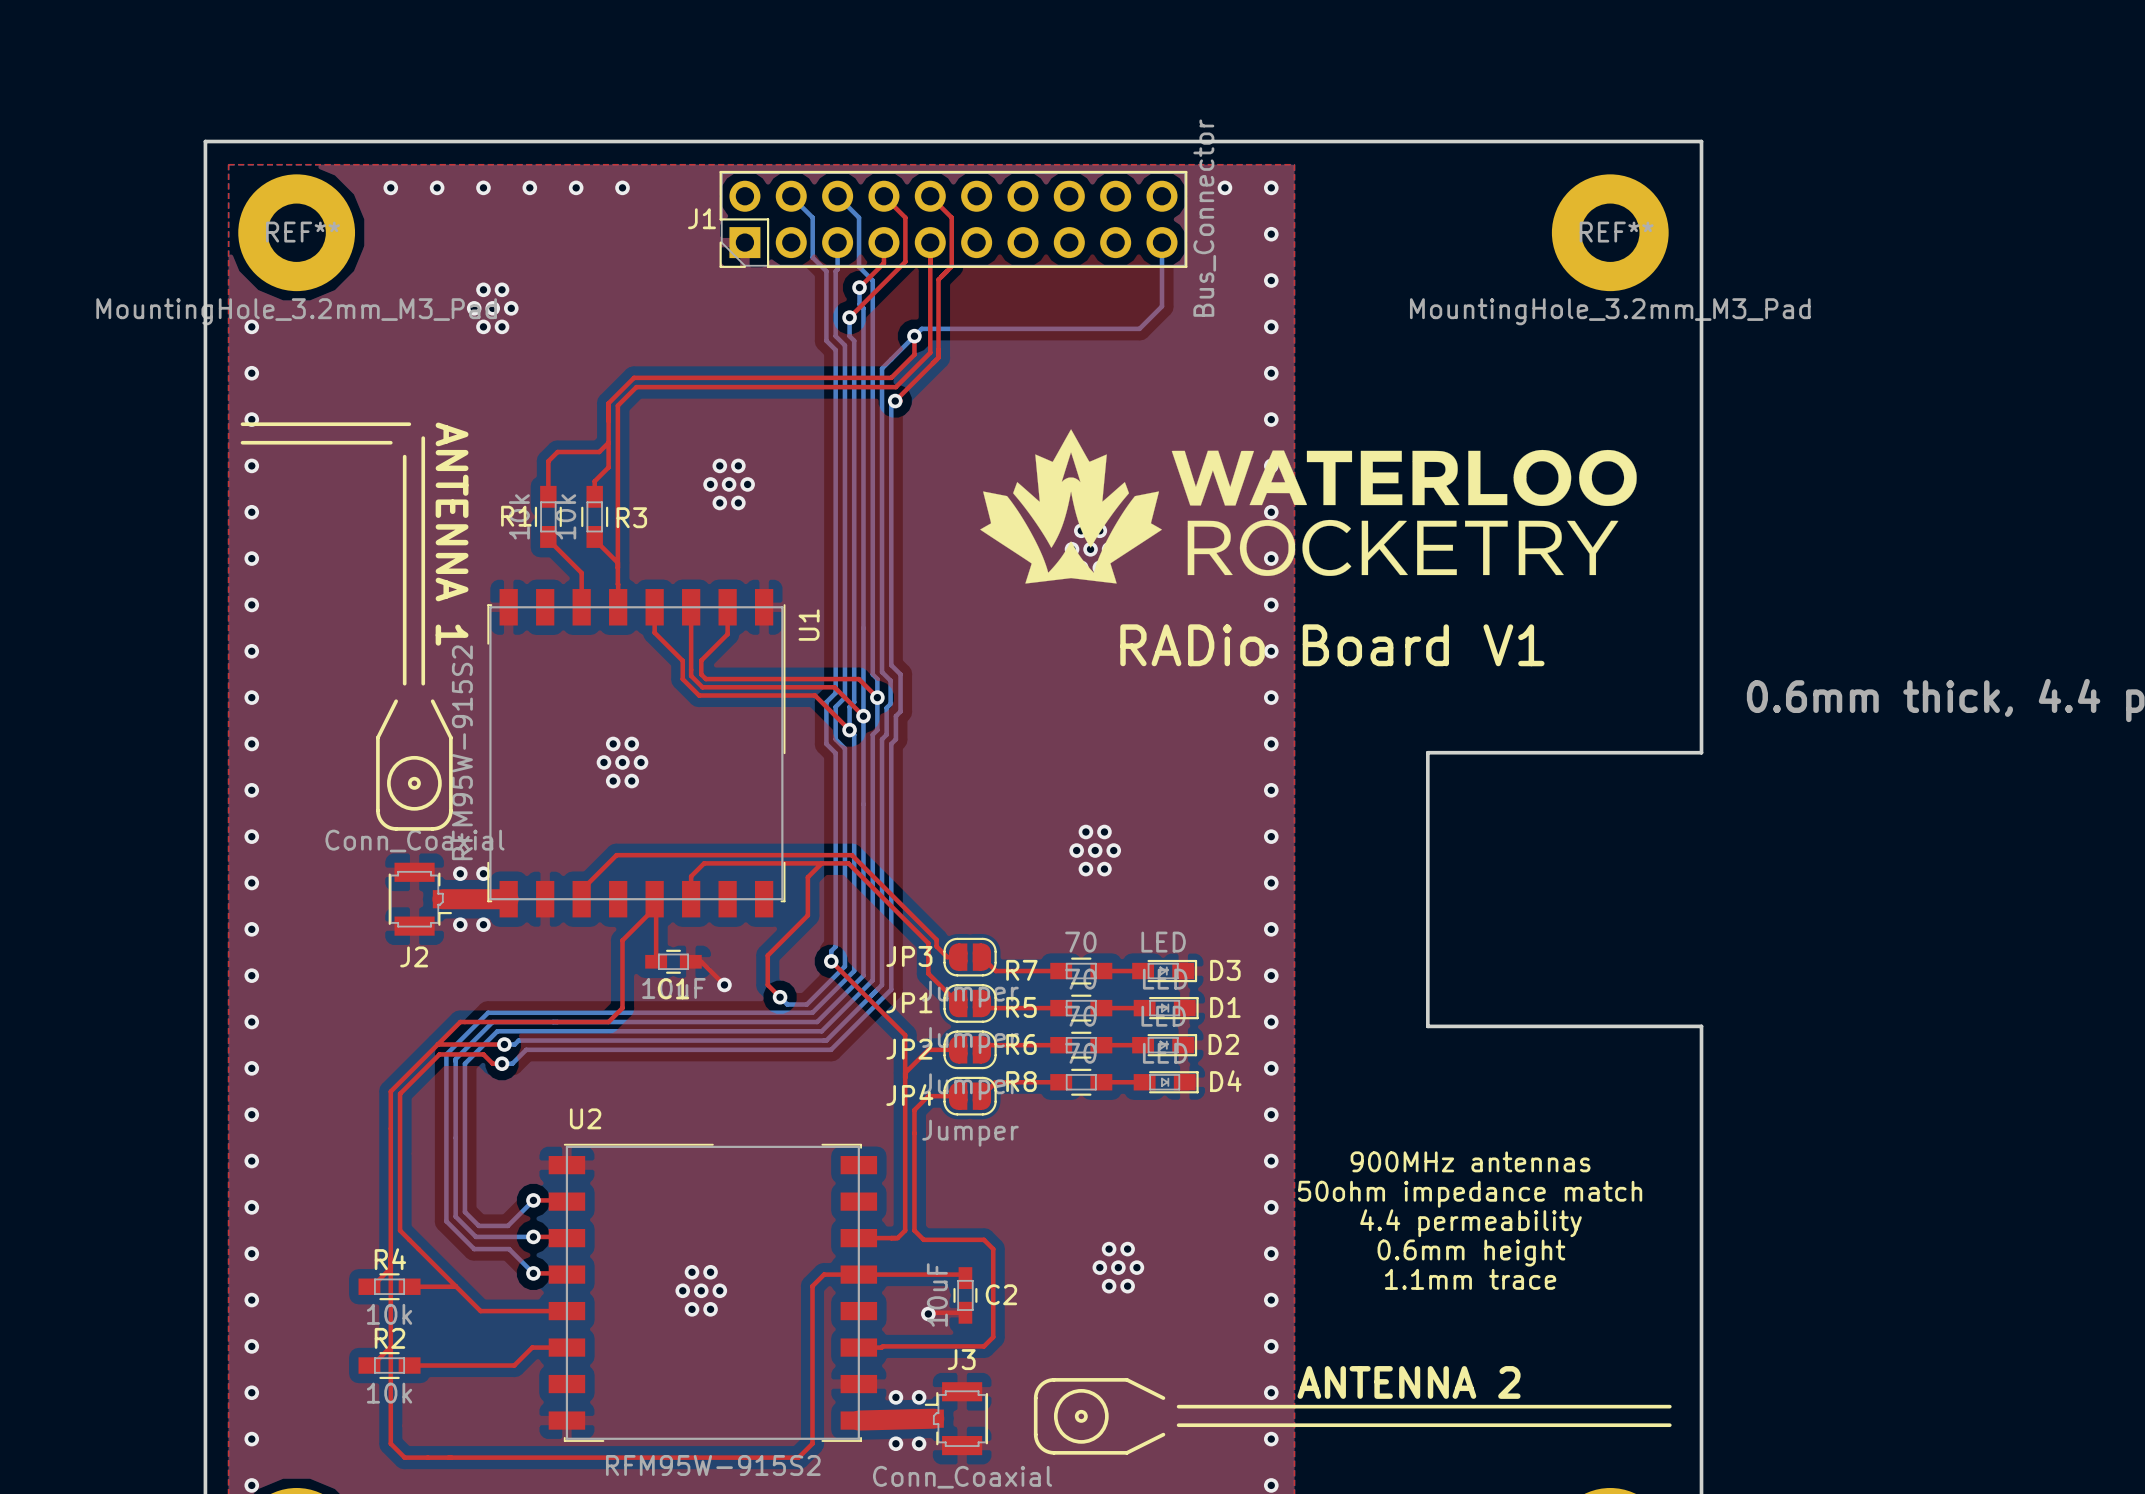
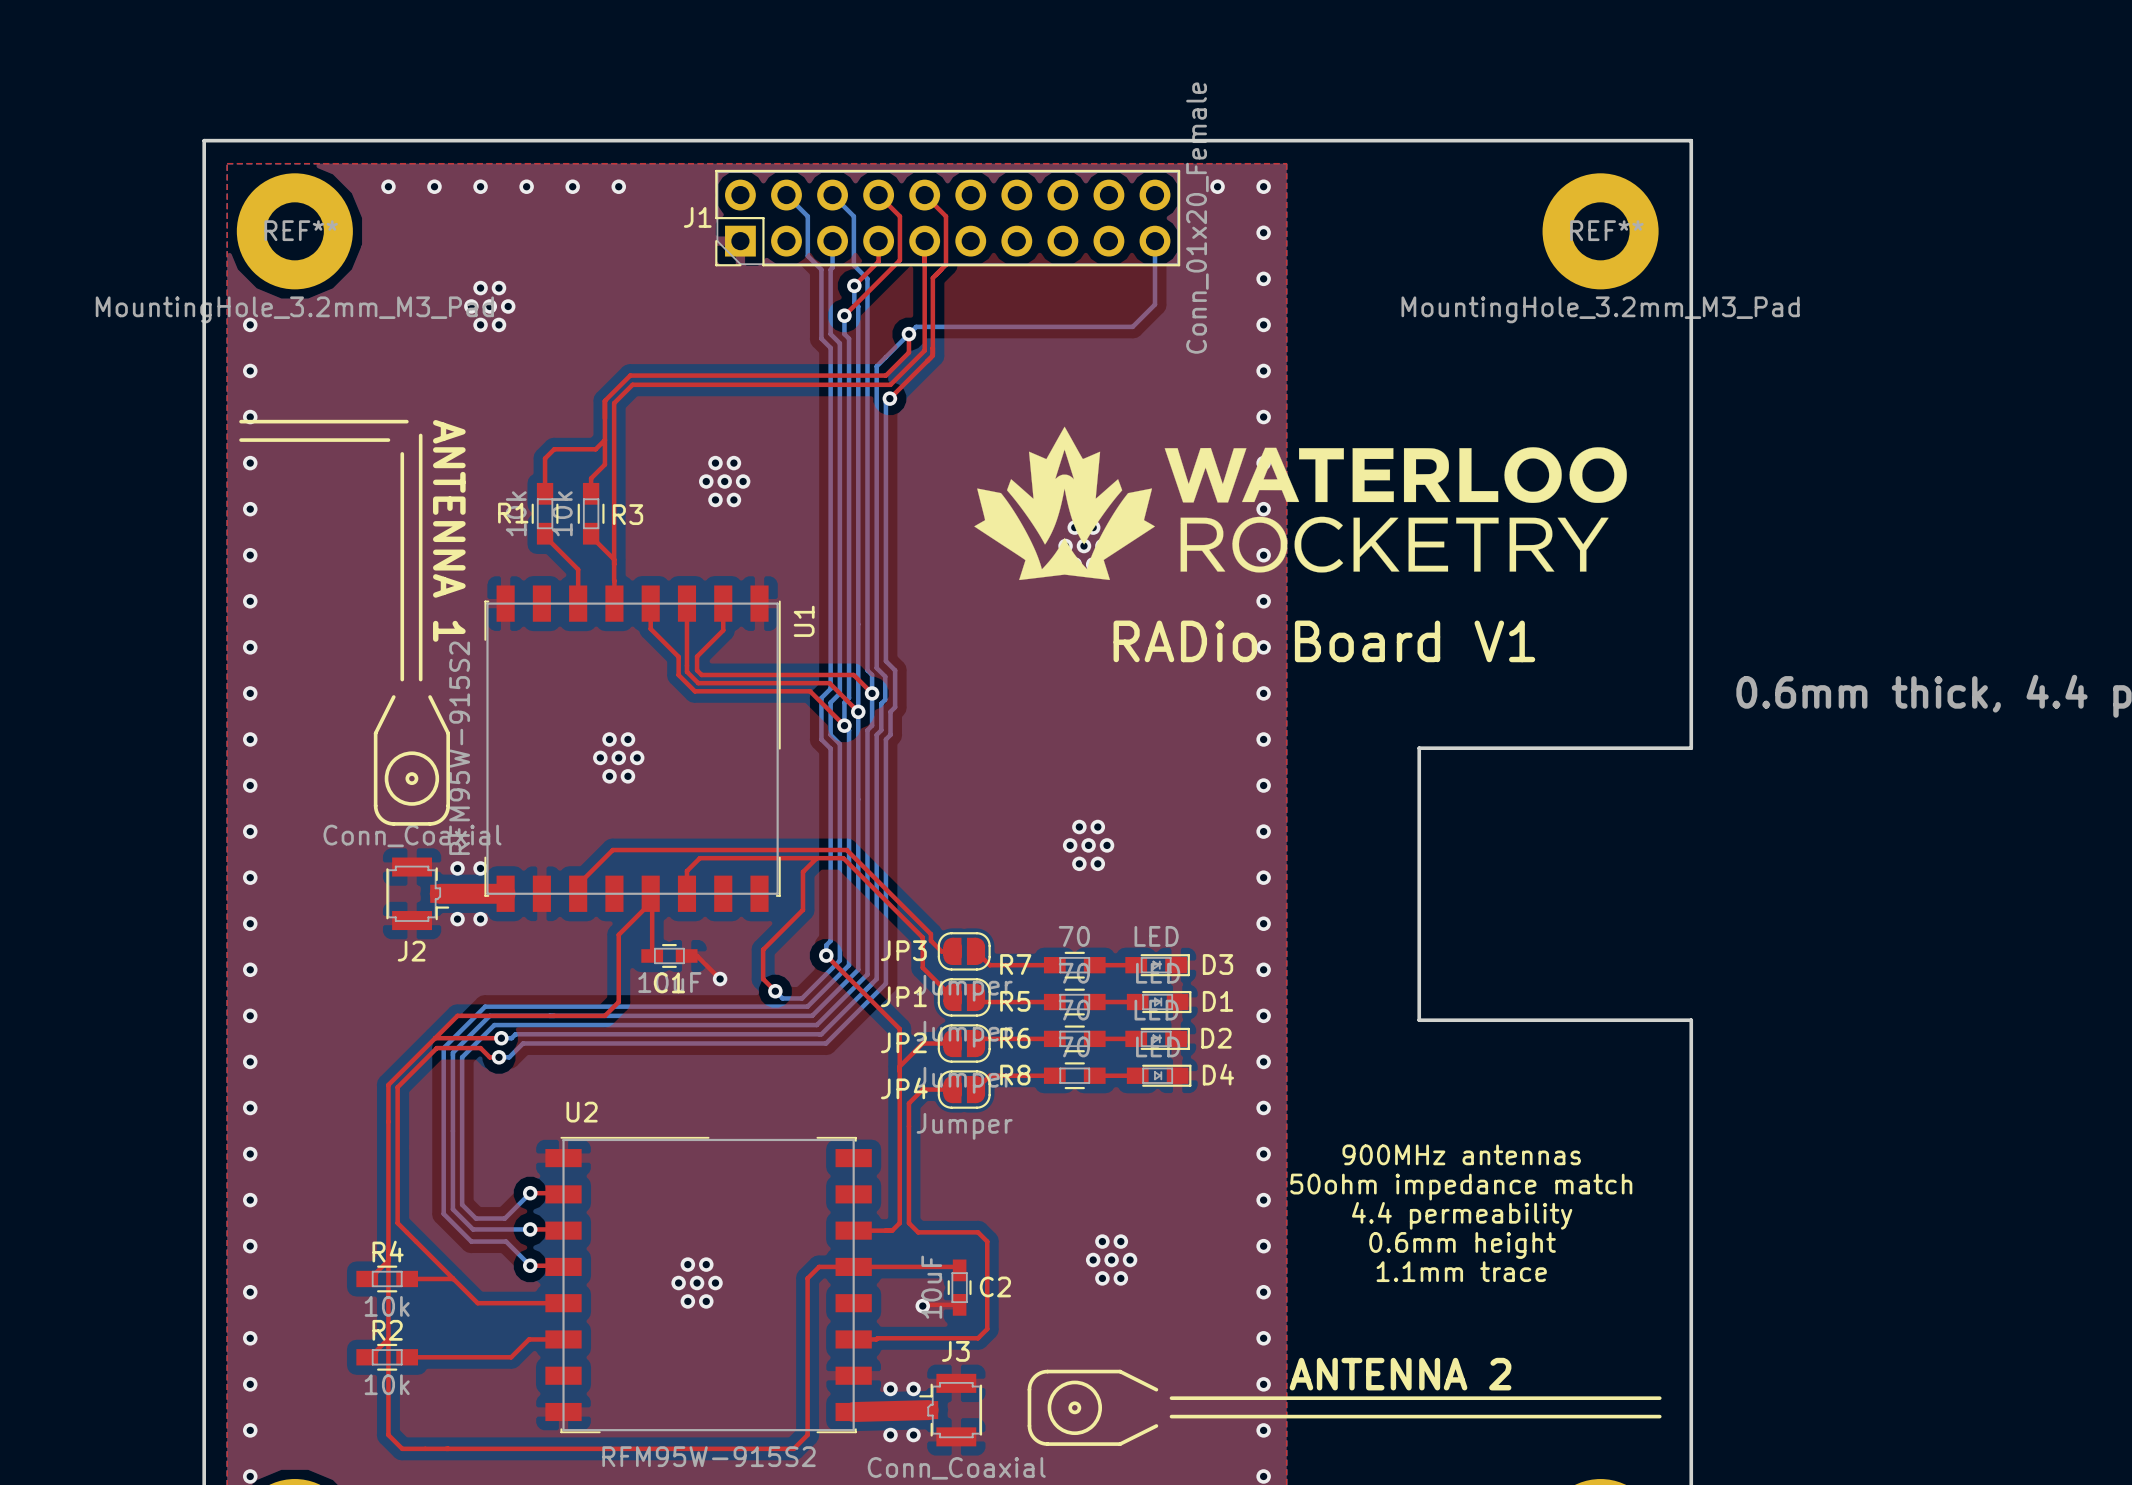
J1 value: Bus_Connector (1204, 218) -> Conn_01x20_Female (1197, 218)

